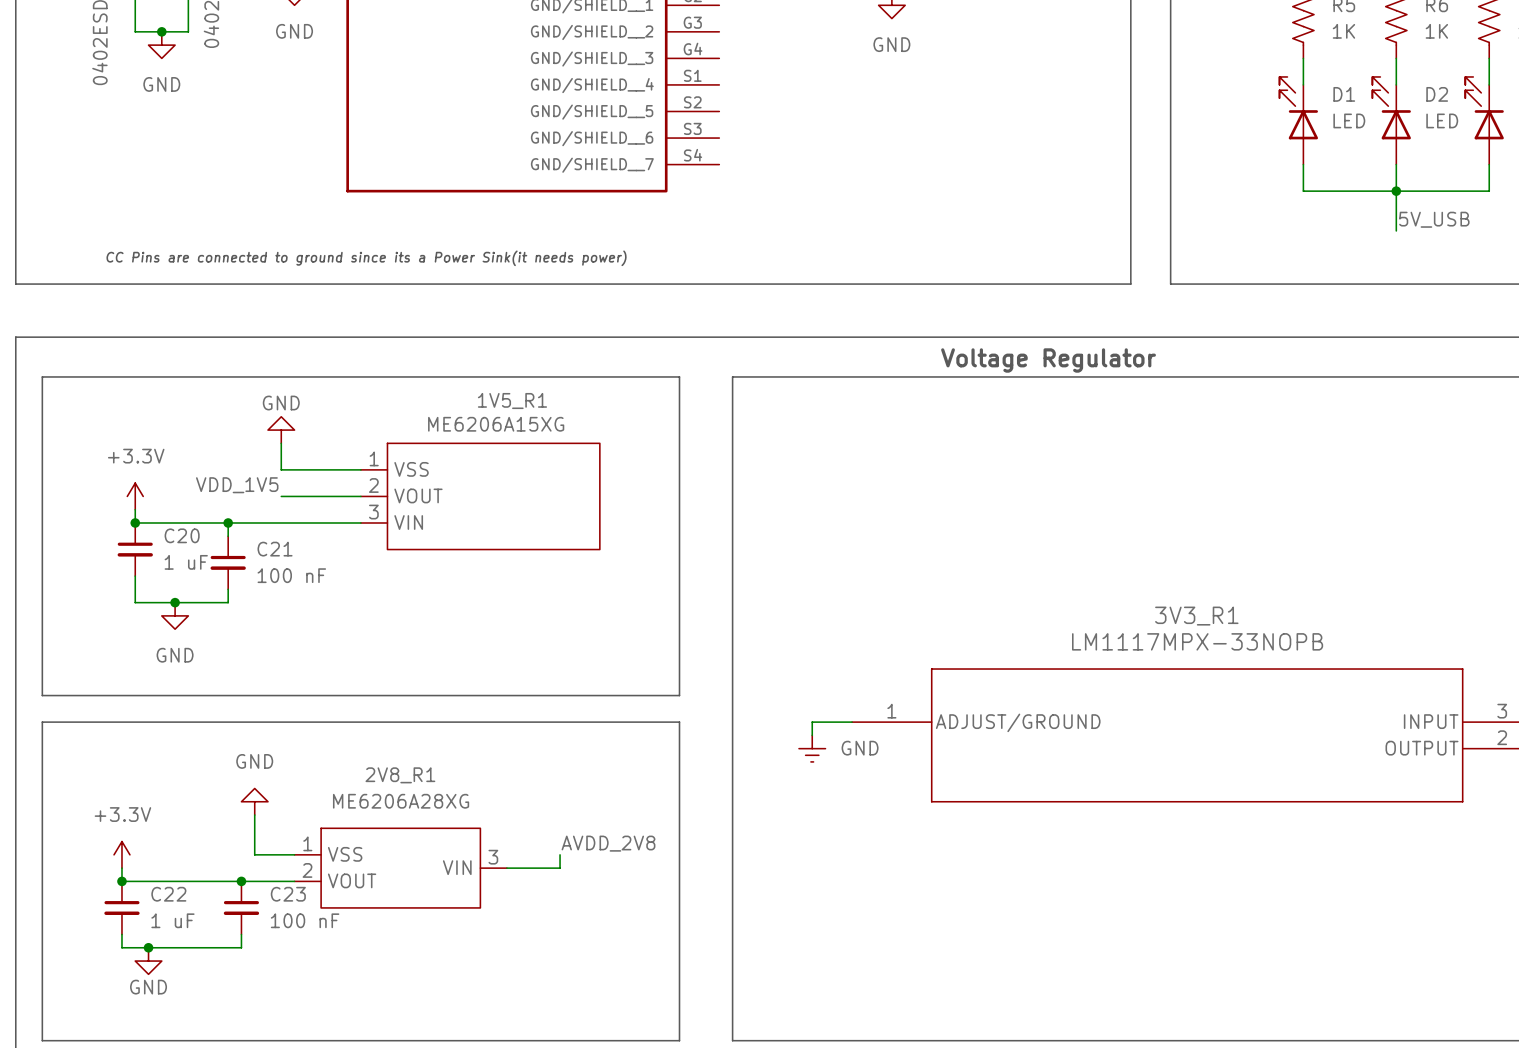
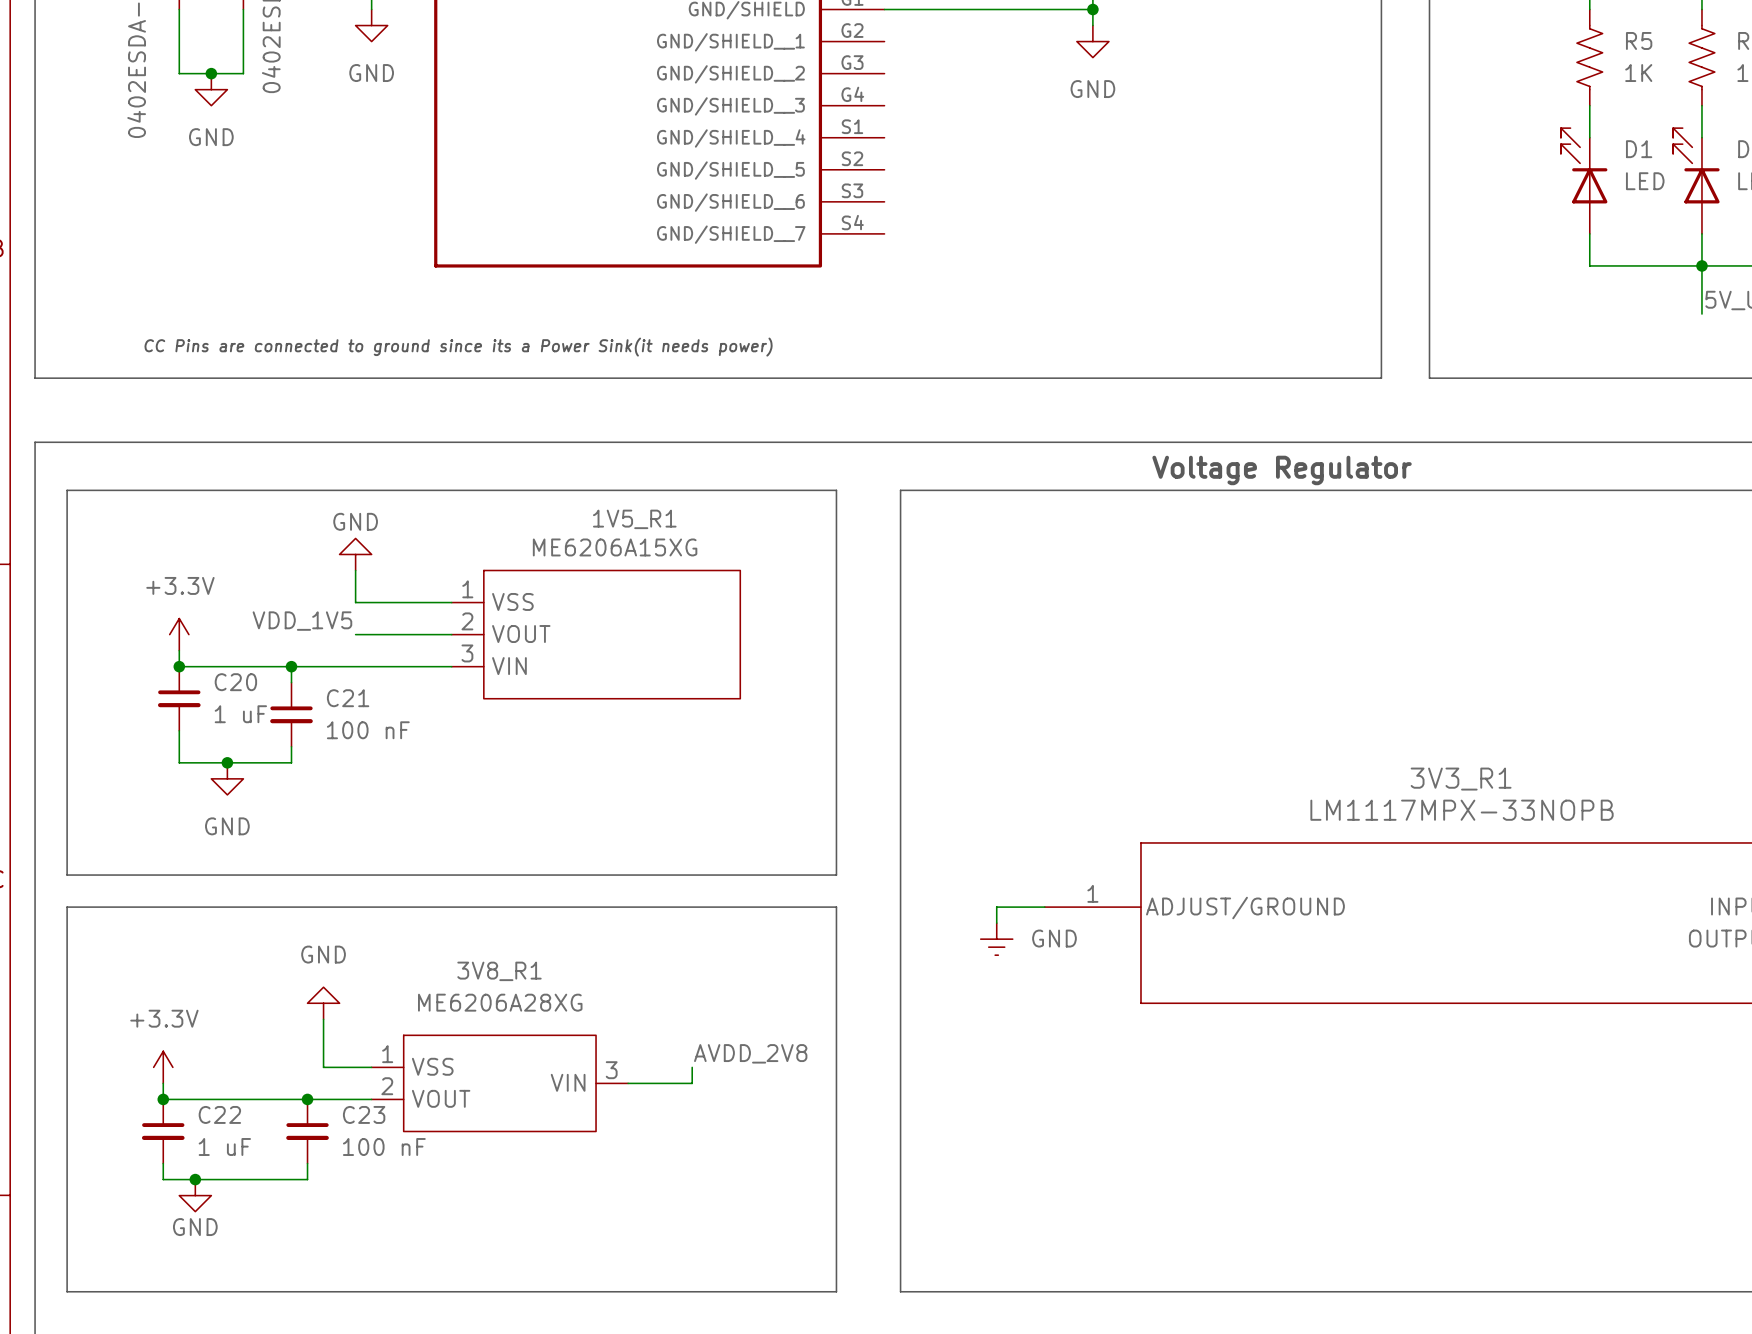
2V8_R1 name: 2V8_R1 (400, 775) -> 3V8_R1 (499, 971)

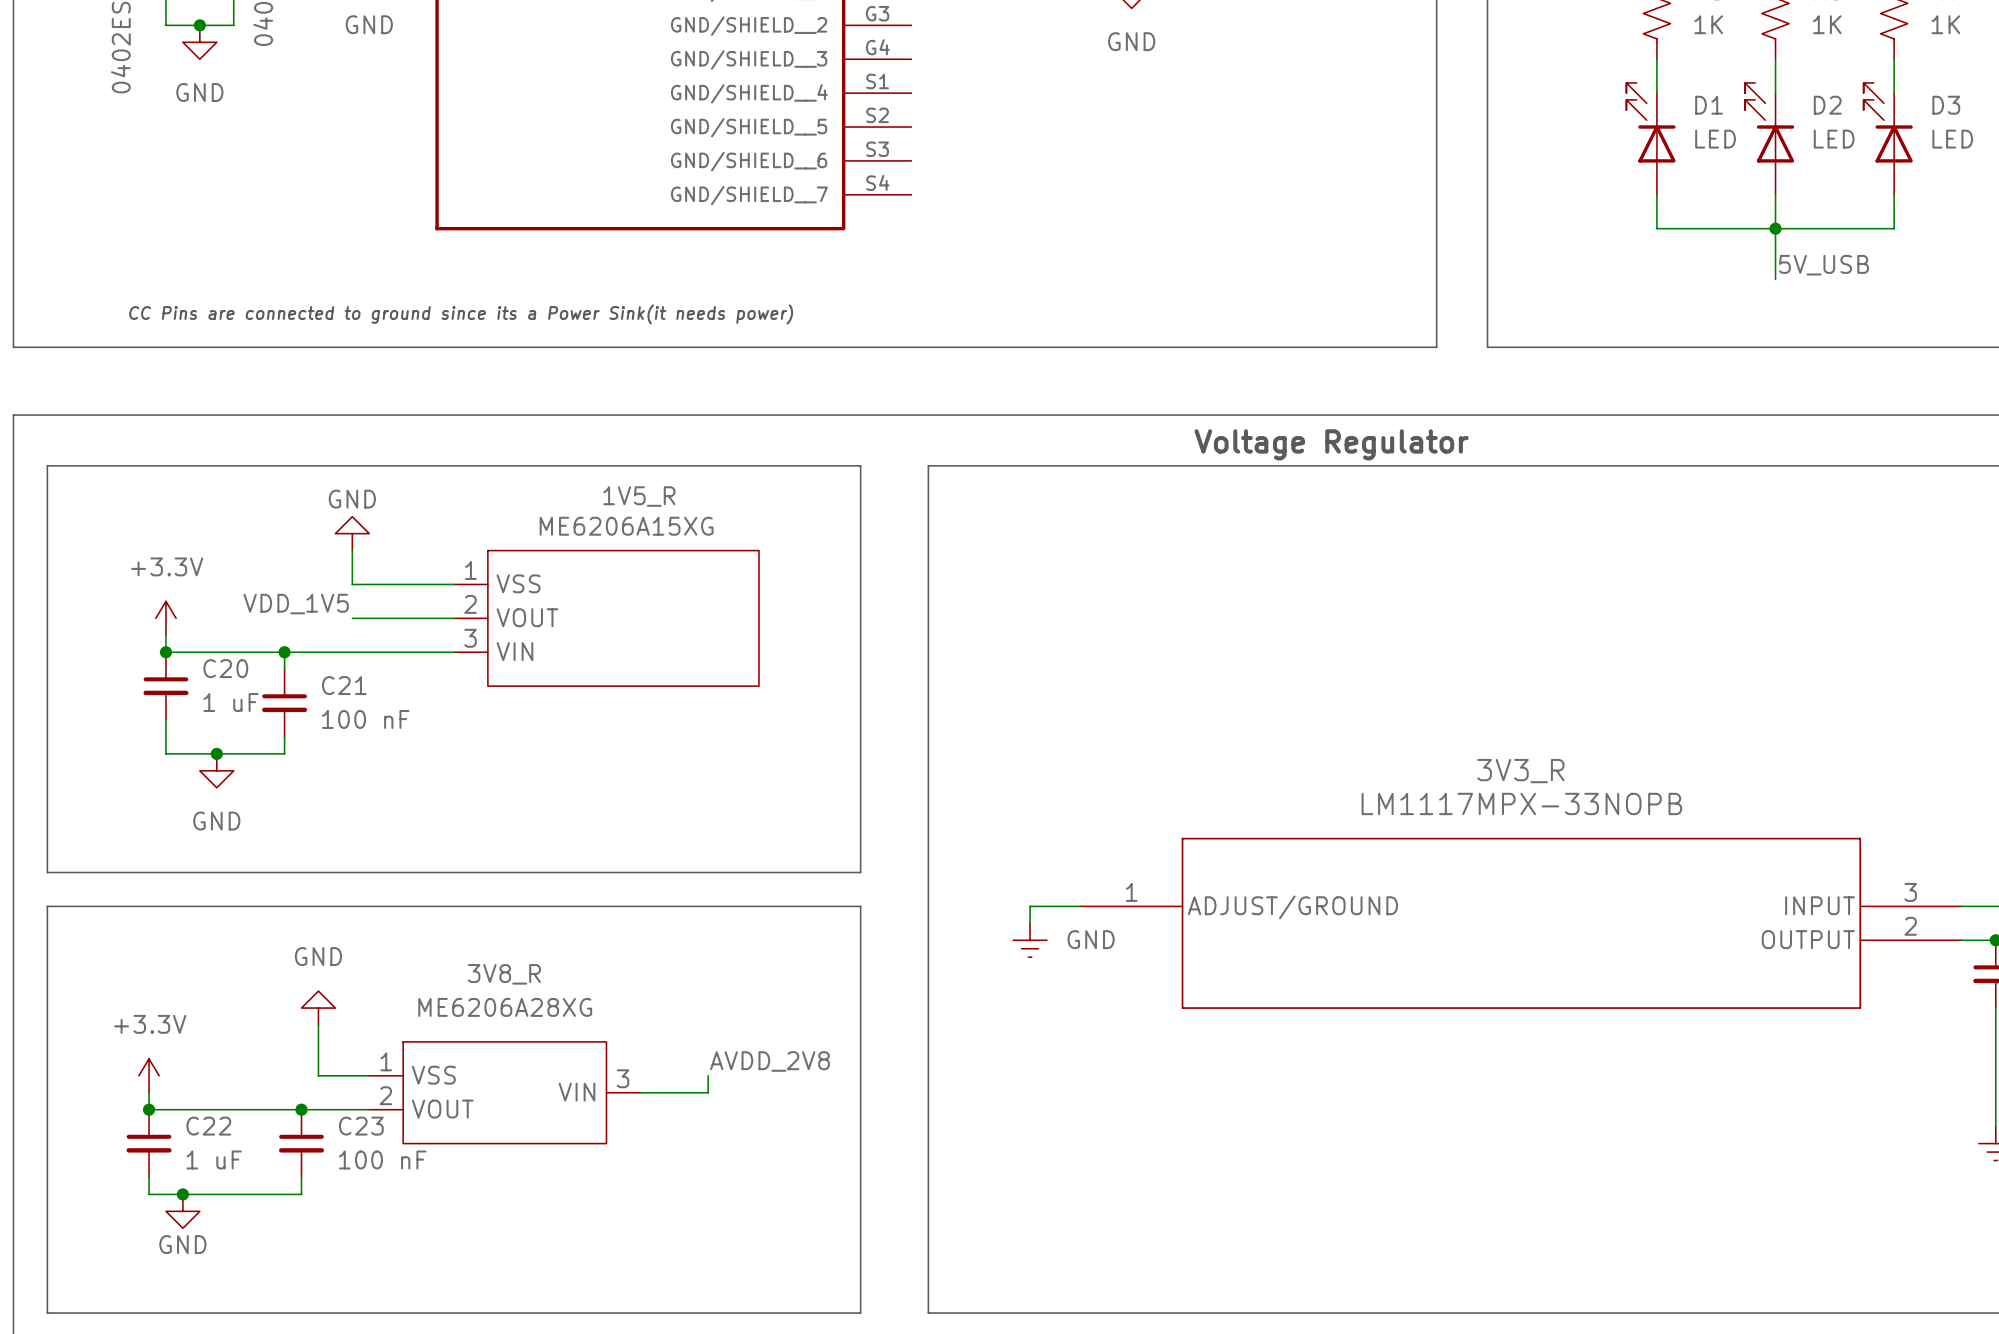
1V5_R1 name: 1V5_R1 (634, 519) -> 1V5_R (639, 496)
3V3_R1 name: 3V3_R1 (1461, 779) -> 3V3_R (1520, 771)
3V8_R1 name: 3V8_R1 (499, 971) -> 3V8_R (504, 974)

